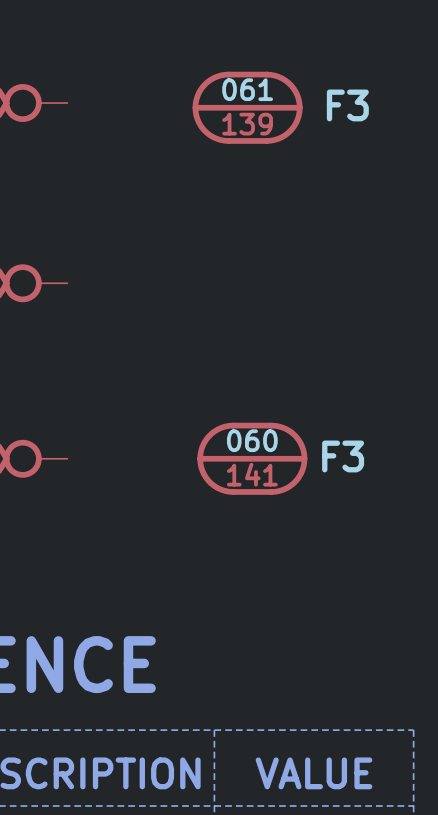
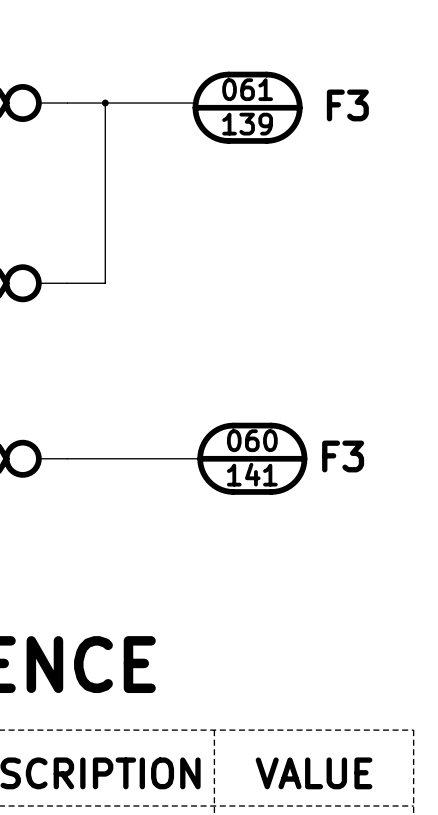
wire: none -> (67, 103) (195, 103)
wire: none -> (105, 103) (105, 283) (67, 283)
junction: none -> (105, 103)
wire: none -> (67, 458) (200, 458)

